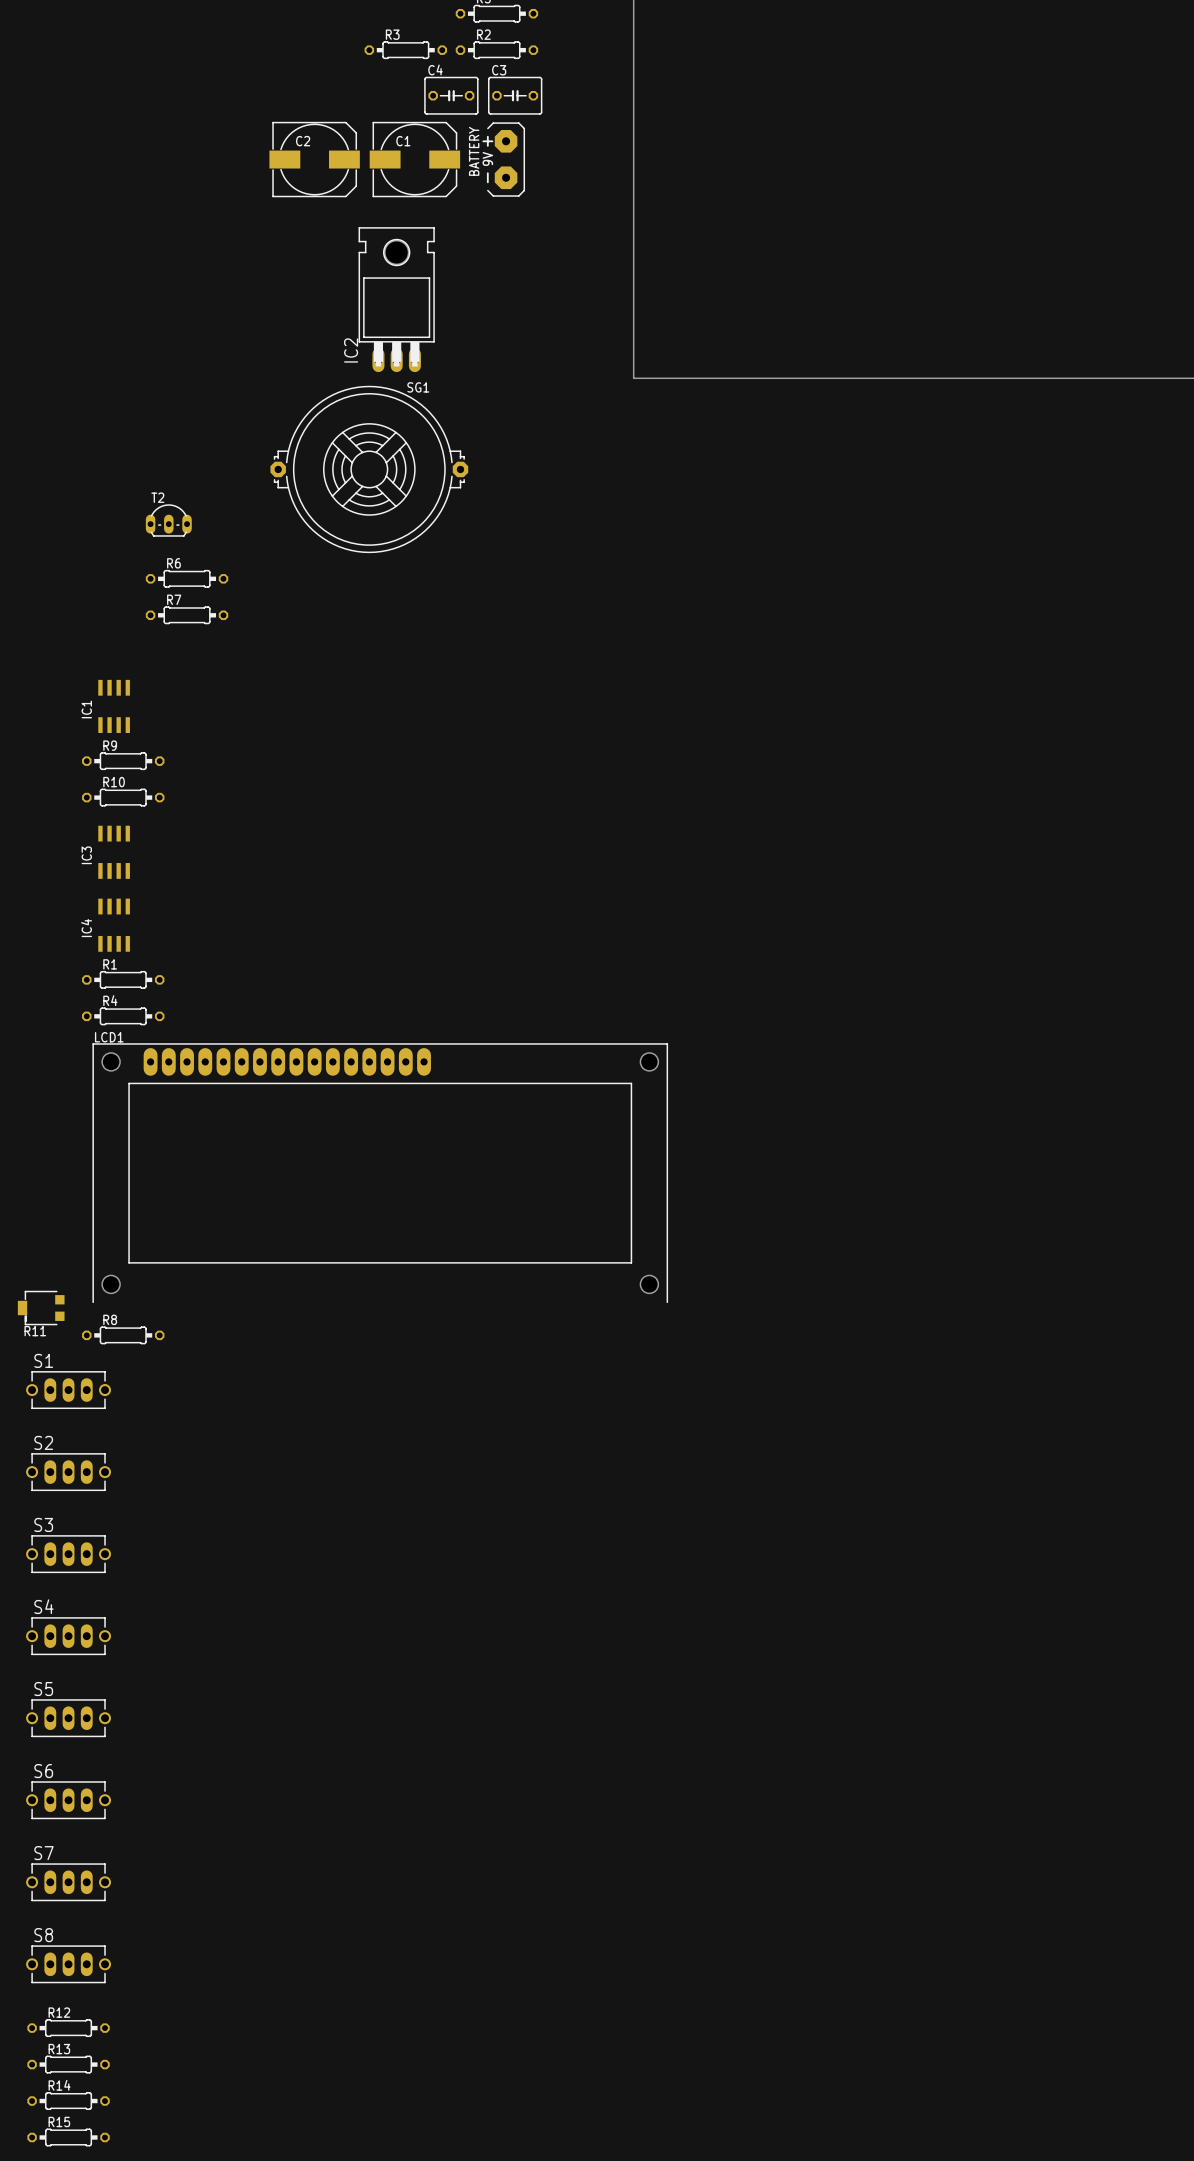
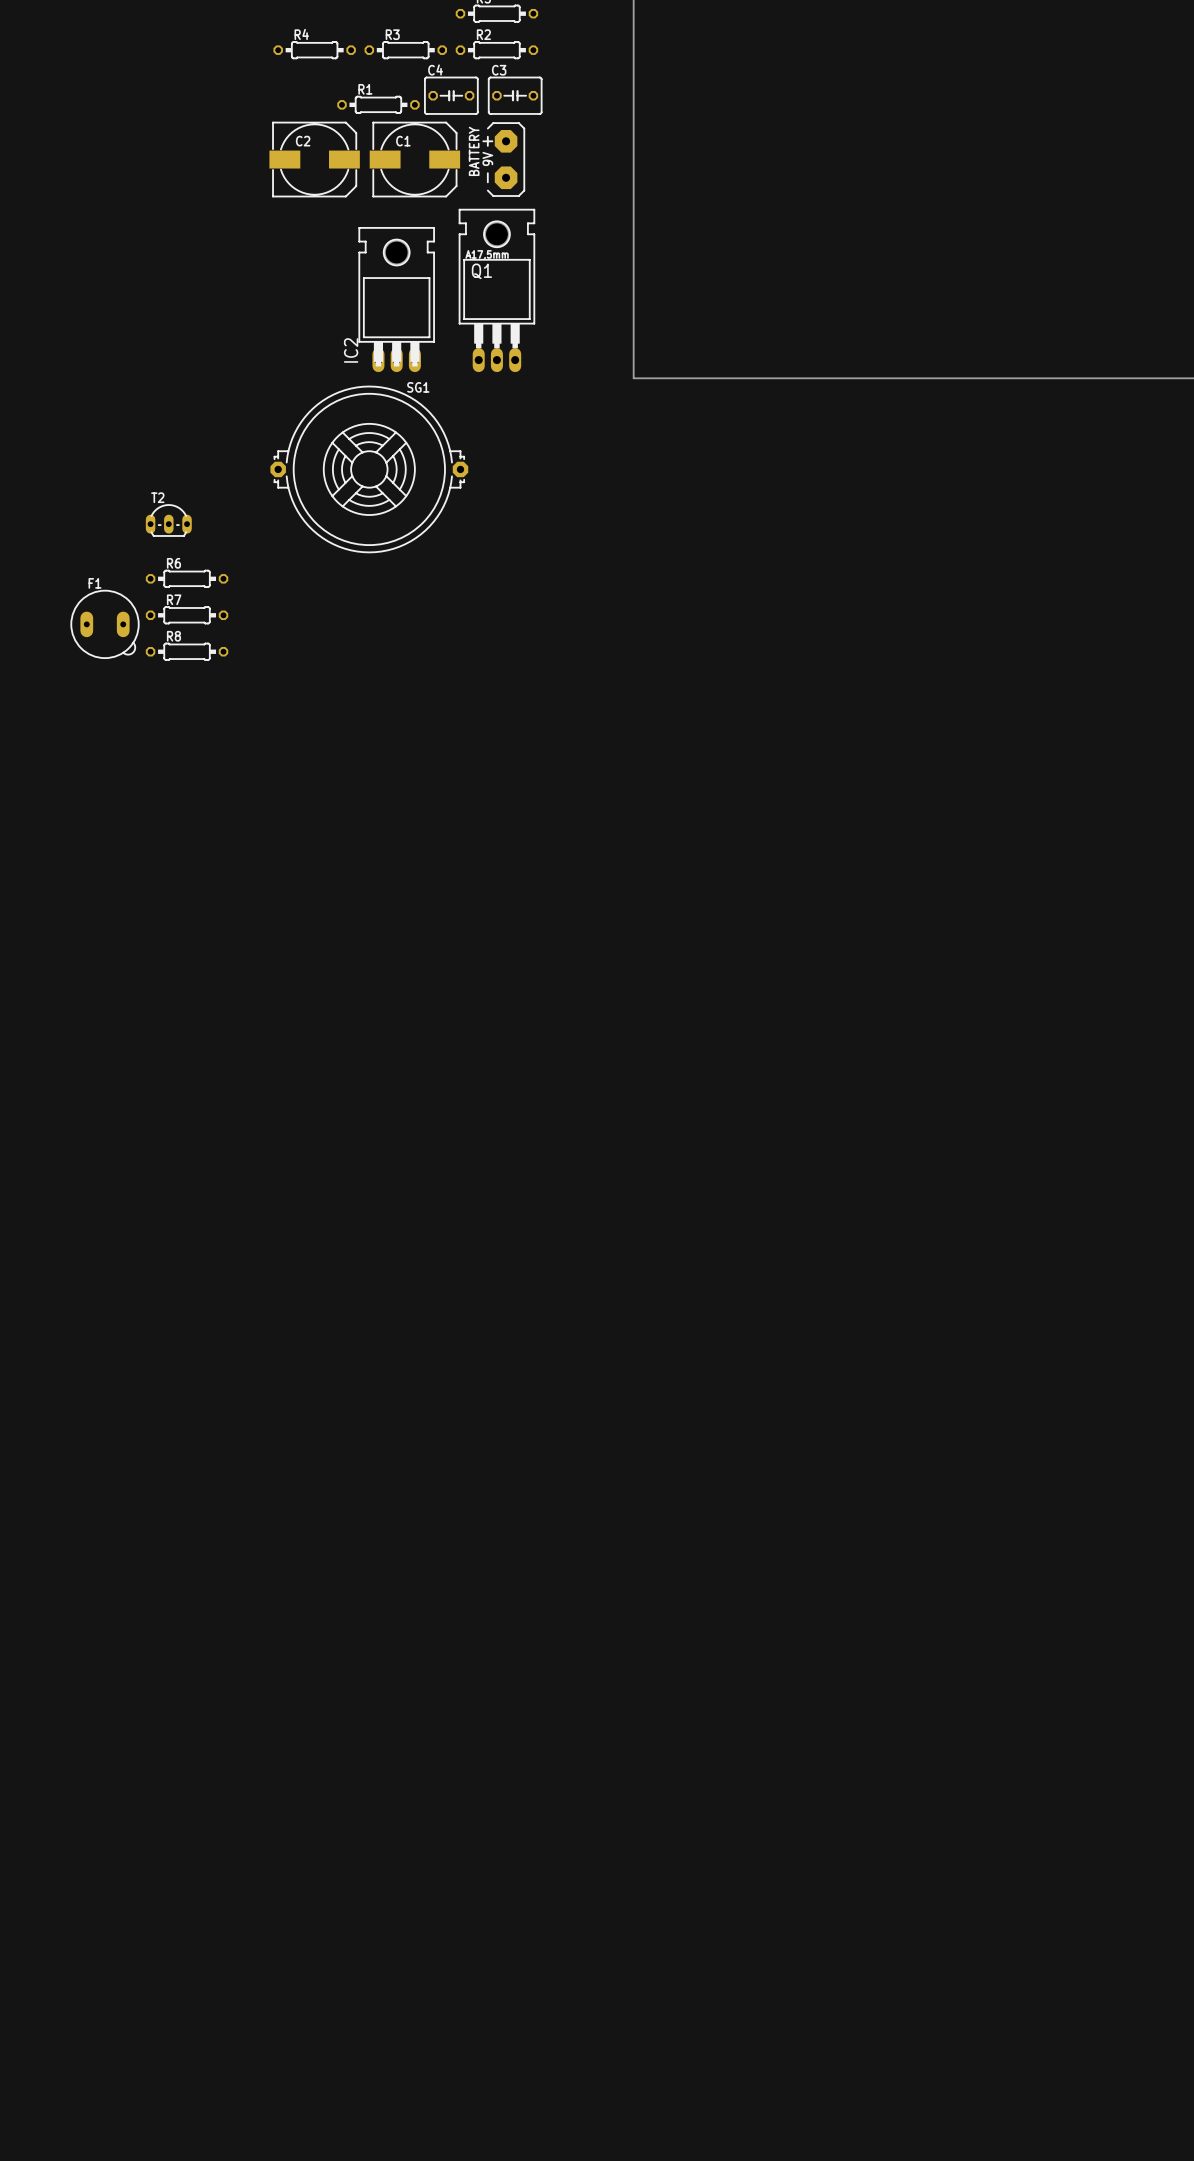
Q1: none -> (496, 290)
F1: none -> (105, 624)
IC1: (114, 706) -> none
R9: (123, 761) -> none
R10: (123, 797) -> none
IC3: (114, 852) -> none
IC4: (114, 925) -> none
R1 position: (123, 979) -> (378, 104)
R4 position: (123, 1016) -> (314, 50)
LCD1: (380, 1173) -> none
R11: (41, 1308) -> none
R8 position: (123, 1335) -> (187, 651)
S1: (68, 1390) -> none
S2: (68, 1472) -> none
S3: (68, 1554) -> none
S4: (68, 1636) -> none
S5: (68, 1718) -> none
S6: (68, 1800) -> none
S7: (68, 1882) -> none
S8: (68, 1964) -> none
R12: (68, 2028) -> none
R13: (68, 2064) -> none
R14: (68, 2101) -> none
R15: (68, 2137) -> none

